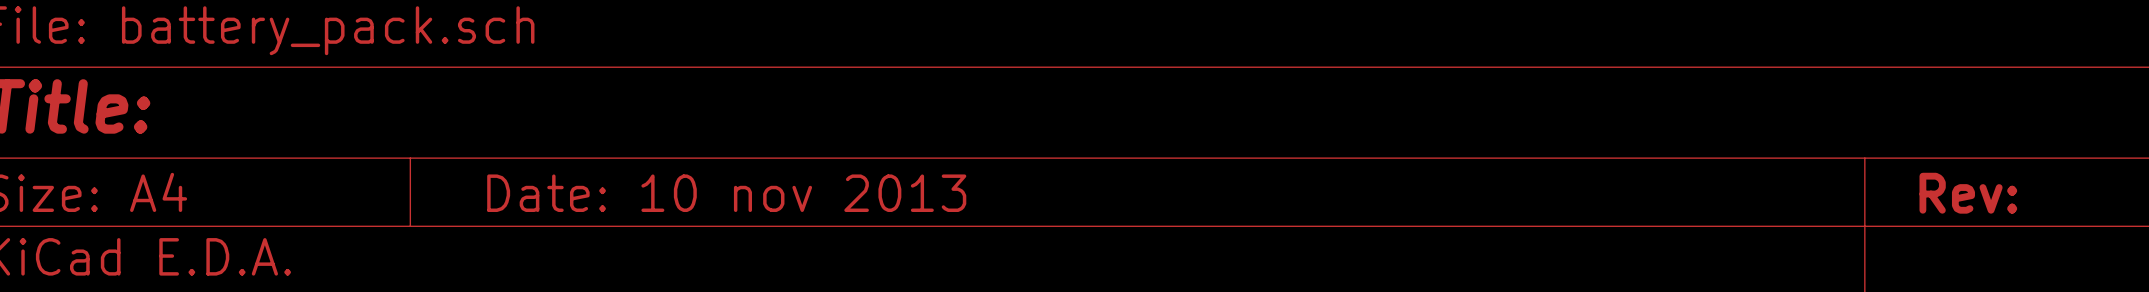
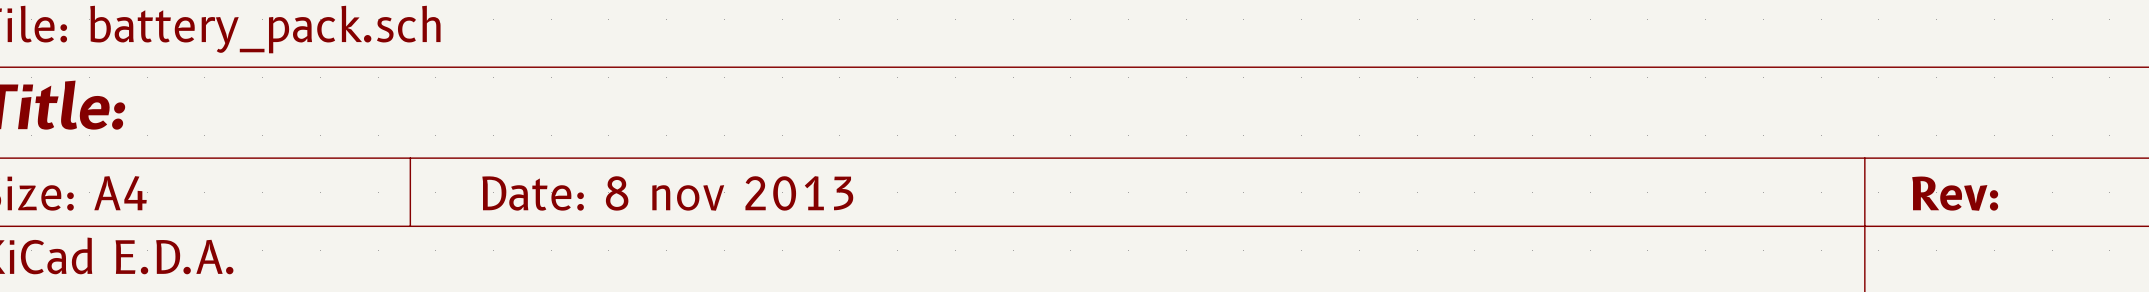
title block: Date: 10 nov 2013 (726, 193) -> Date: 8 nov 2013 (667, 193)

